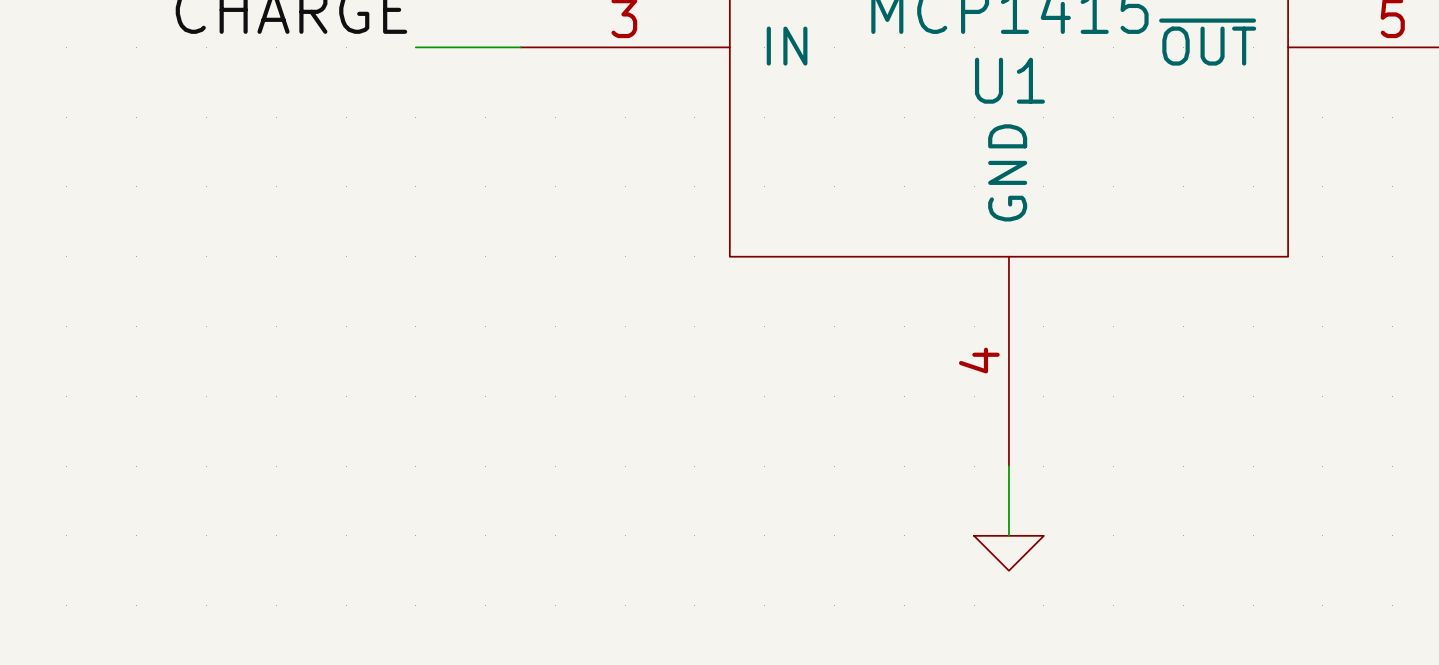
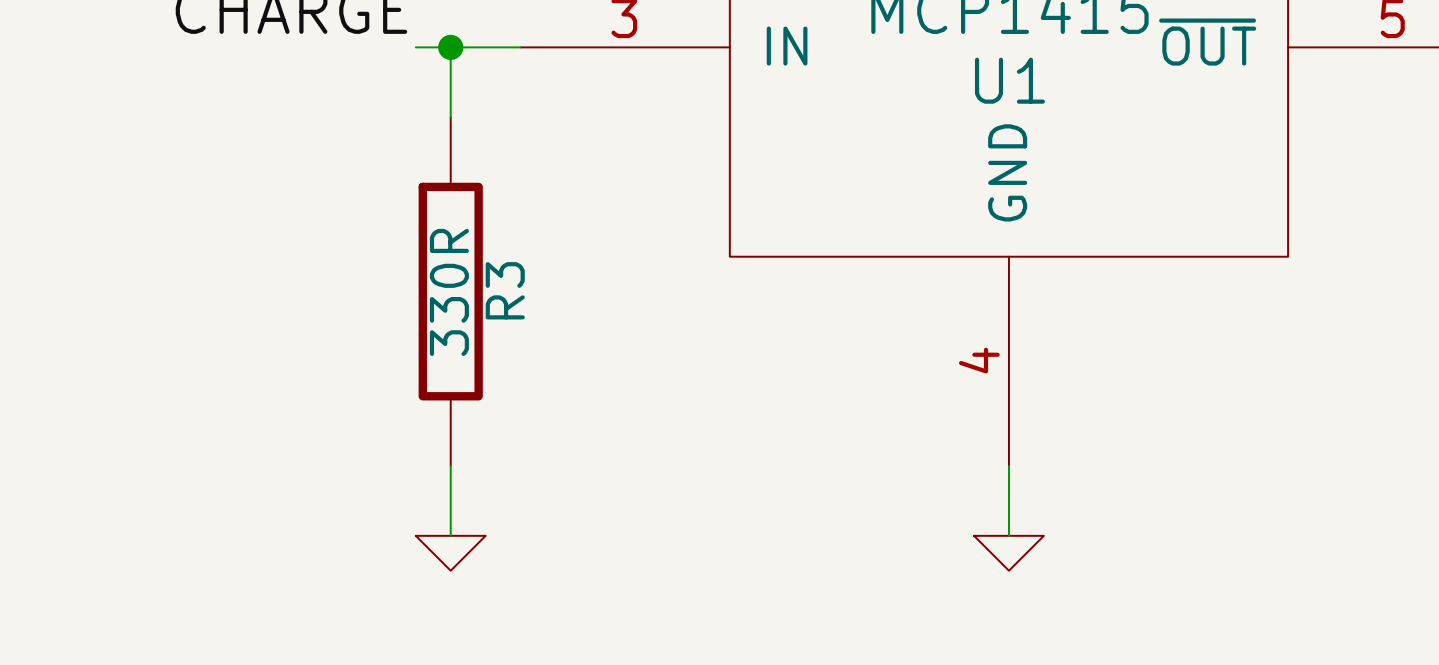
wire: none -> (450, 47) (450, 117)
junction: none -> (450, 47)
R3: none -> 330R (450, 291)
wire: none -> (450, 466) (450, 535)
power symbol: none -> (450, 553)

